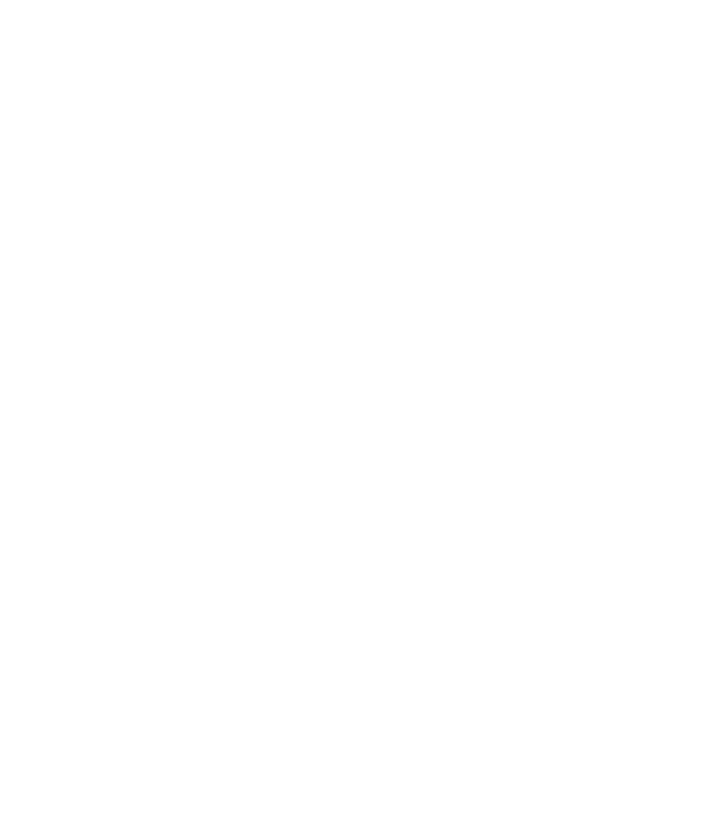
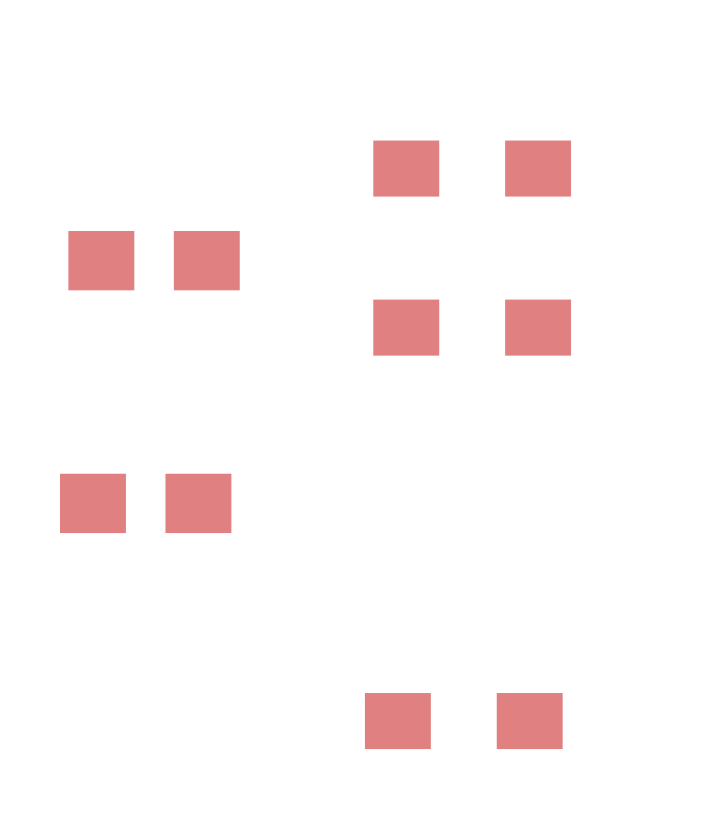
part: none -> (472, 168)
part: none -> (154, 260)
part: none -> (472, 327)
part: none -> (145, 503)
part: none -> (463, 721)

